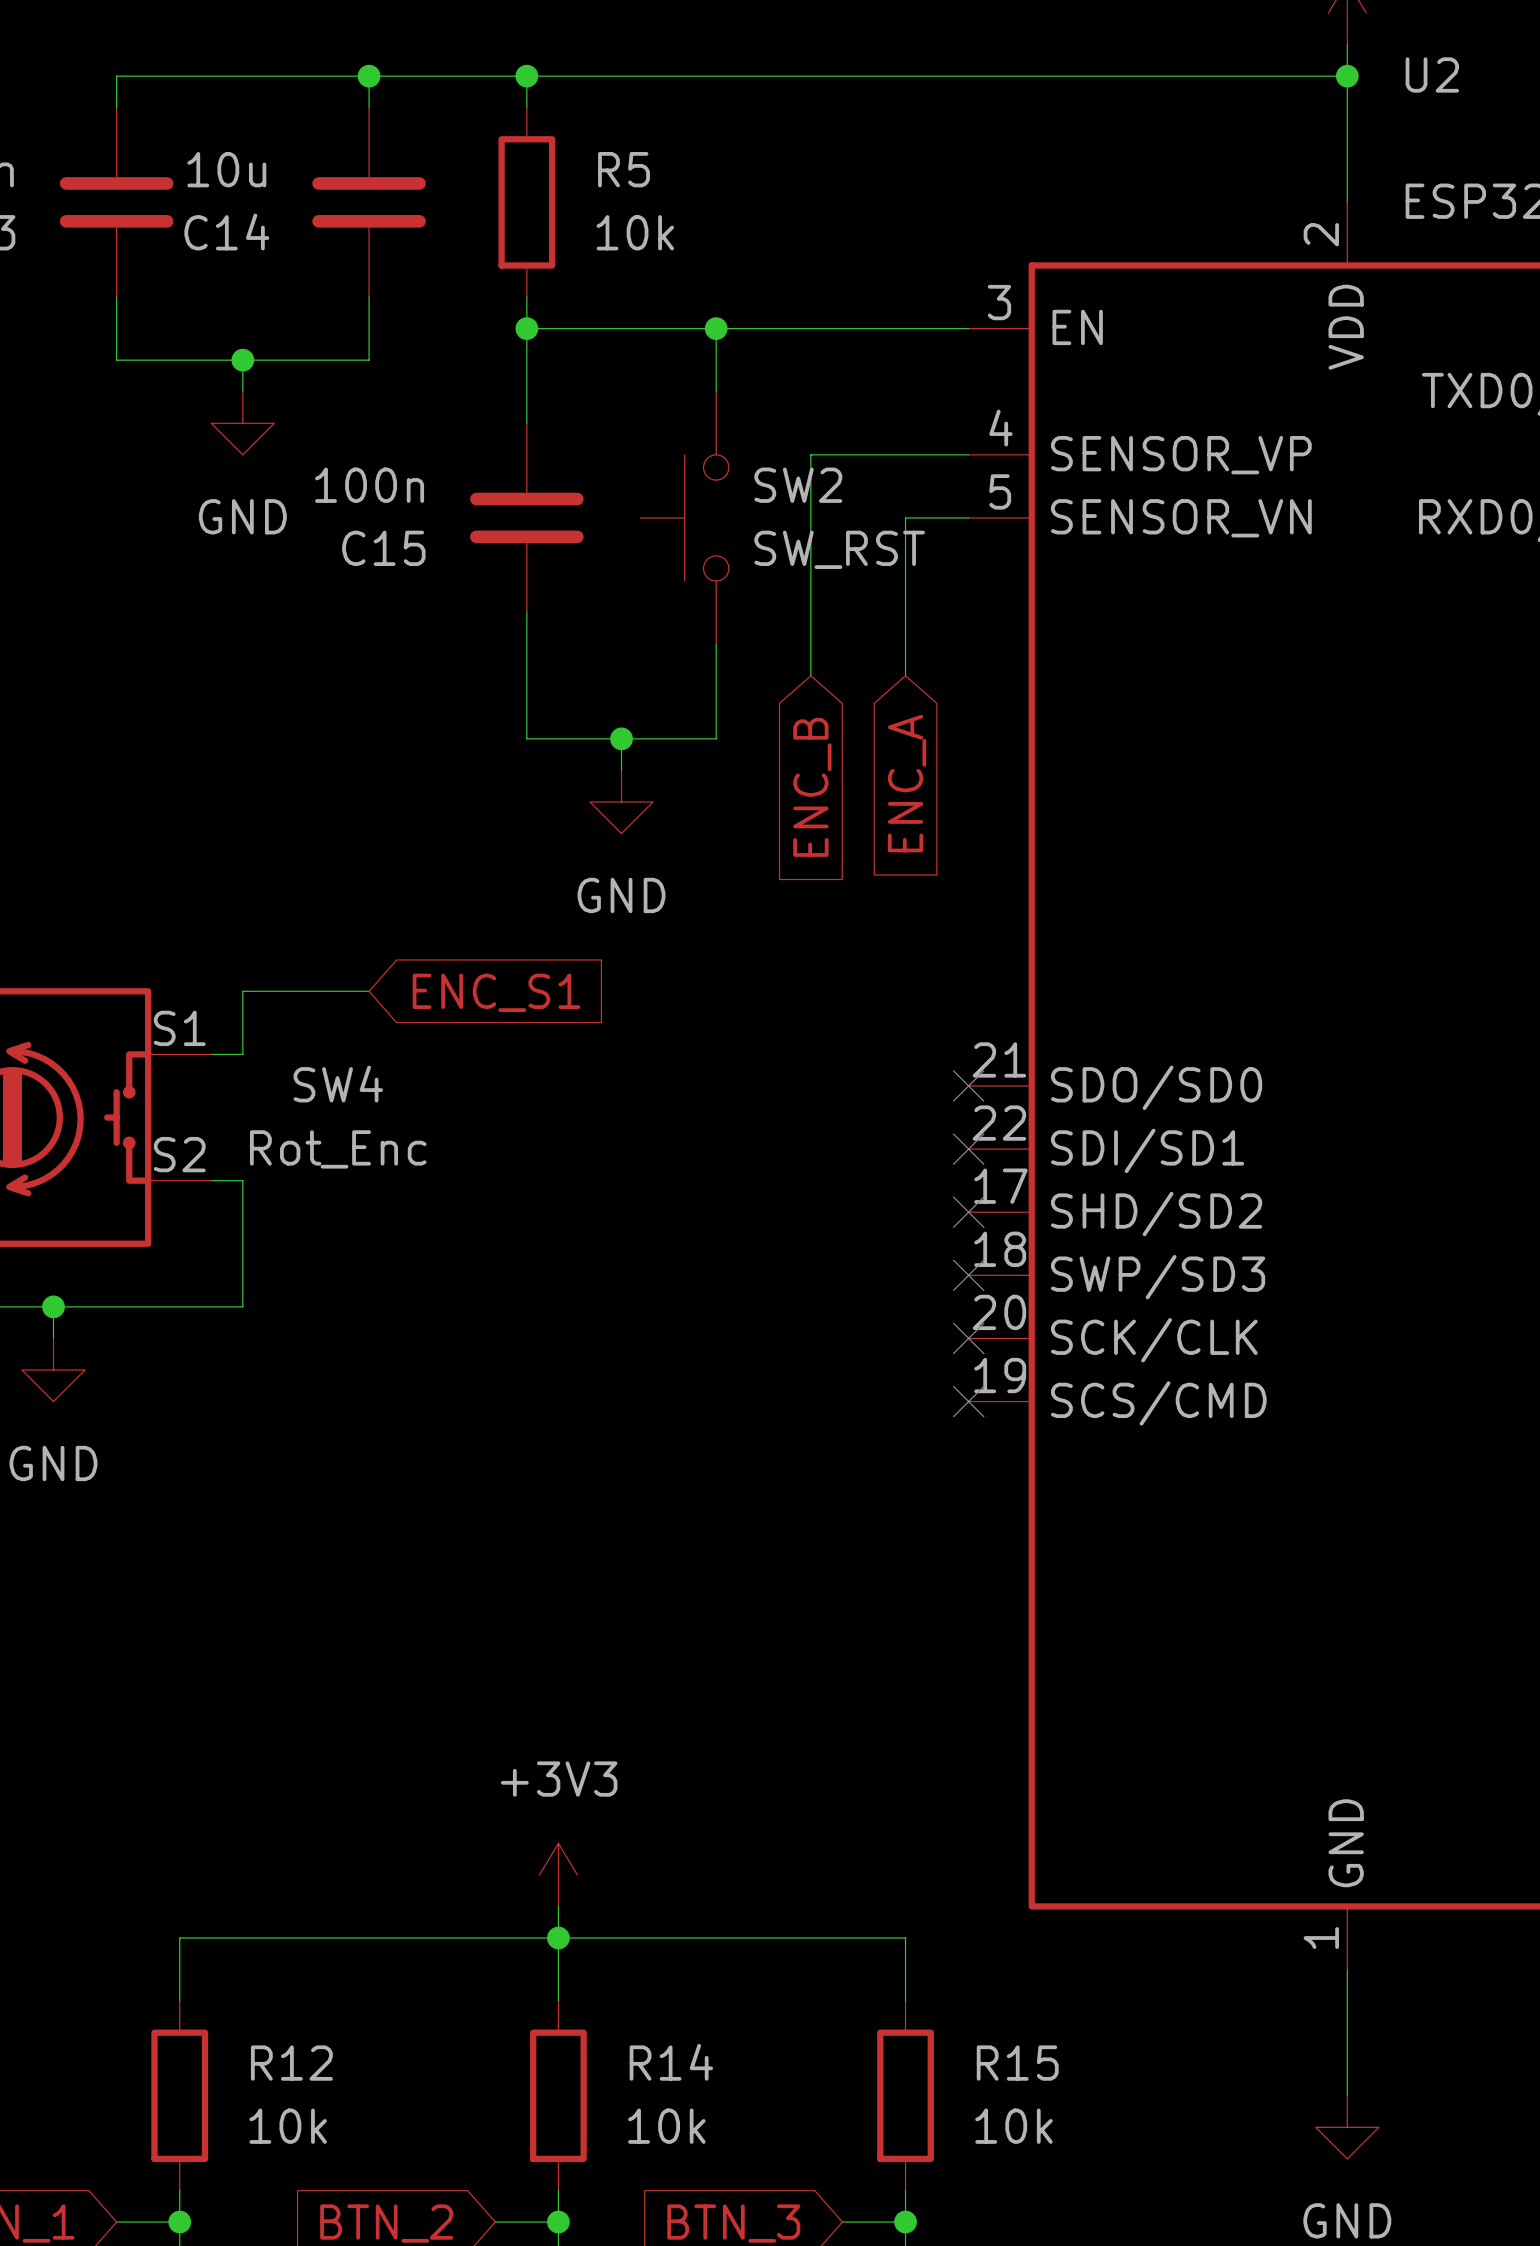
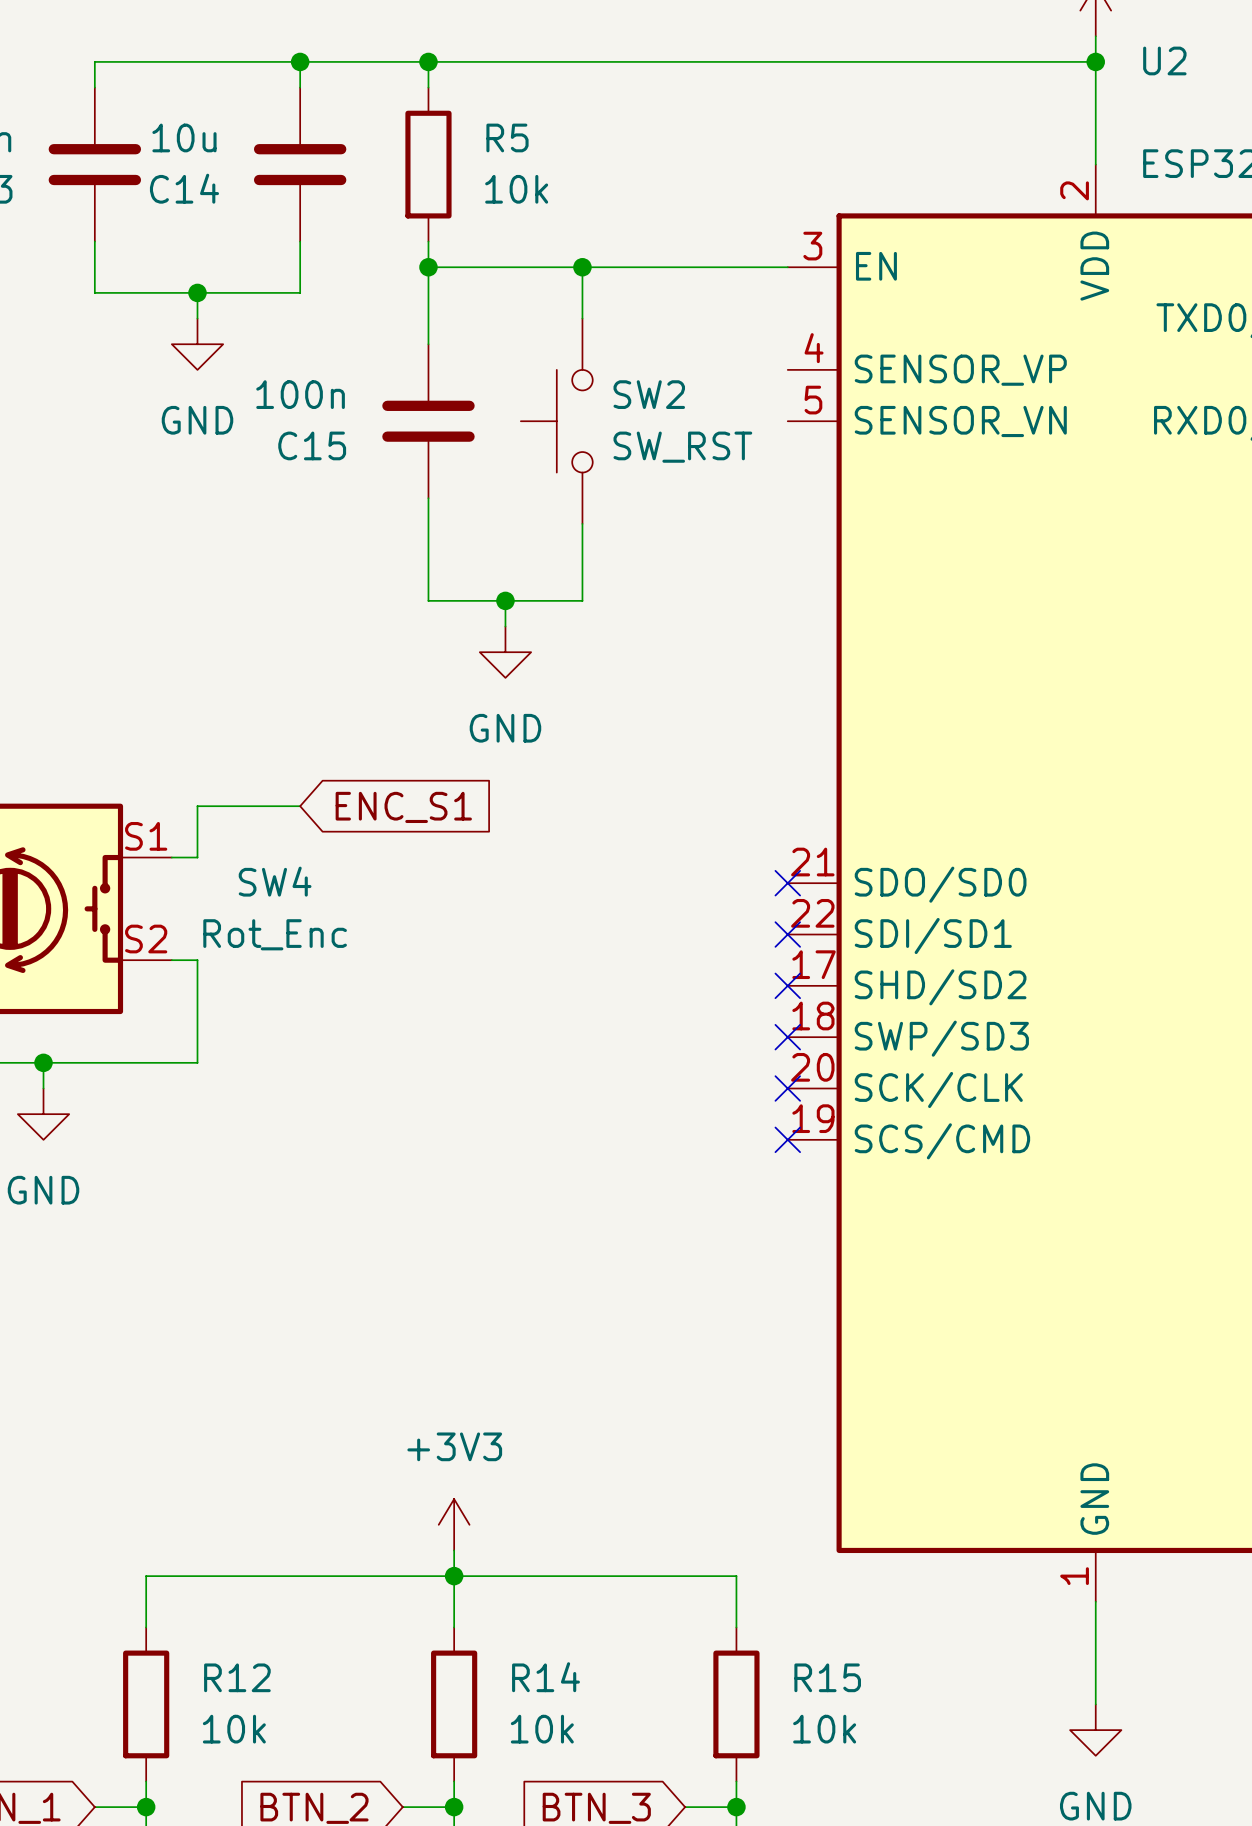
wire: (968, 454) (810, 454) (810, 675) -> none
wire: (968, 517) (905, 517) (905, 675) -> none
global label: ENC_A (907, 783) -> none
global label: ENC_B (812, 787) -> none

